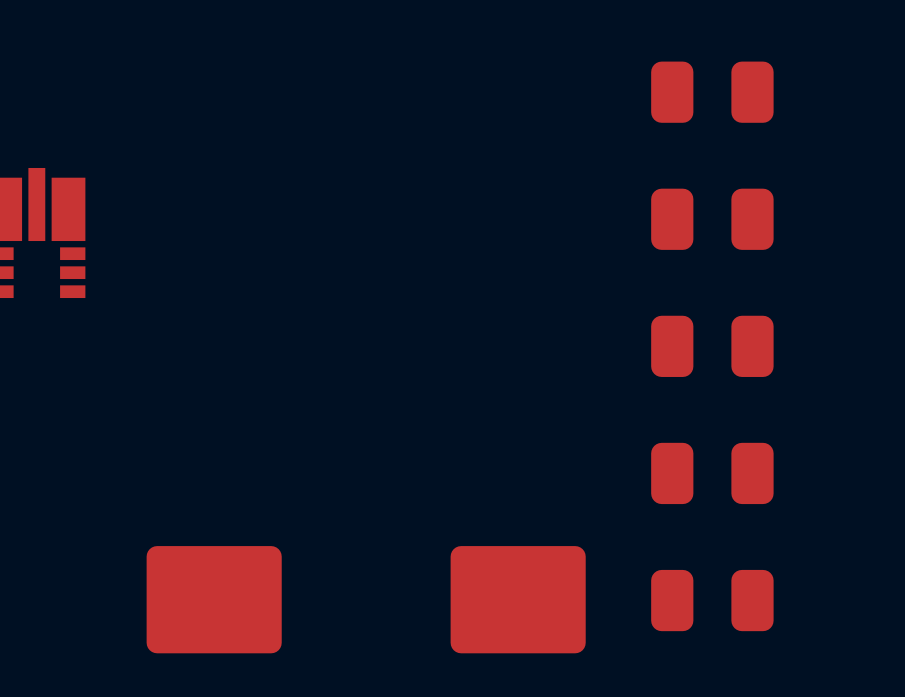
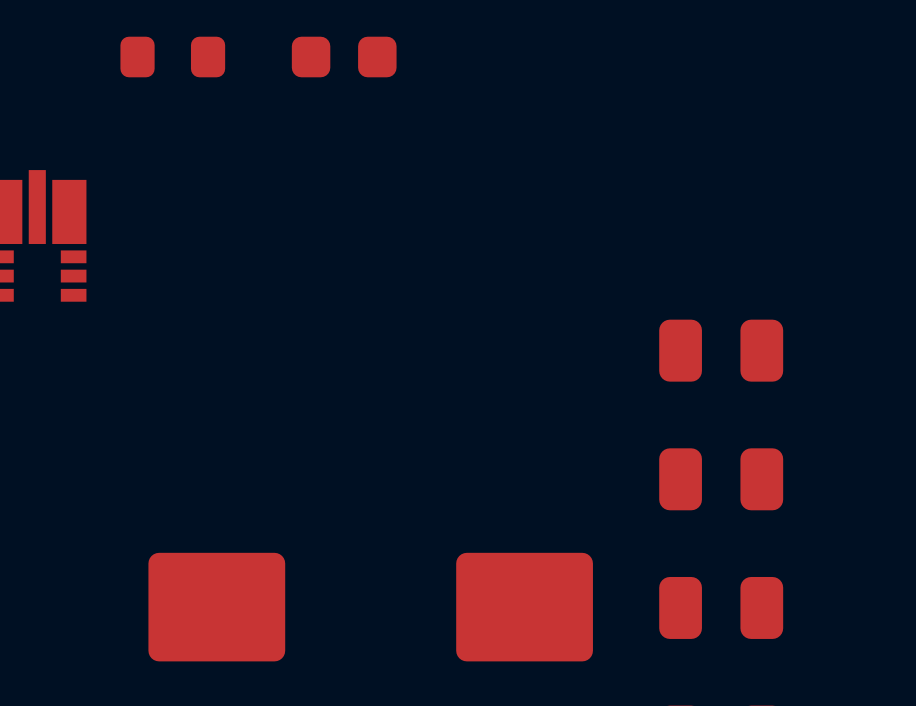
part: none -> (172, 57)
part: none -> (344, 57)
part: (712, 92) -> none
part: (712, 219) -> none

